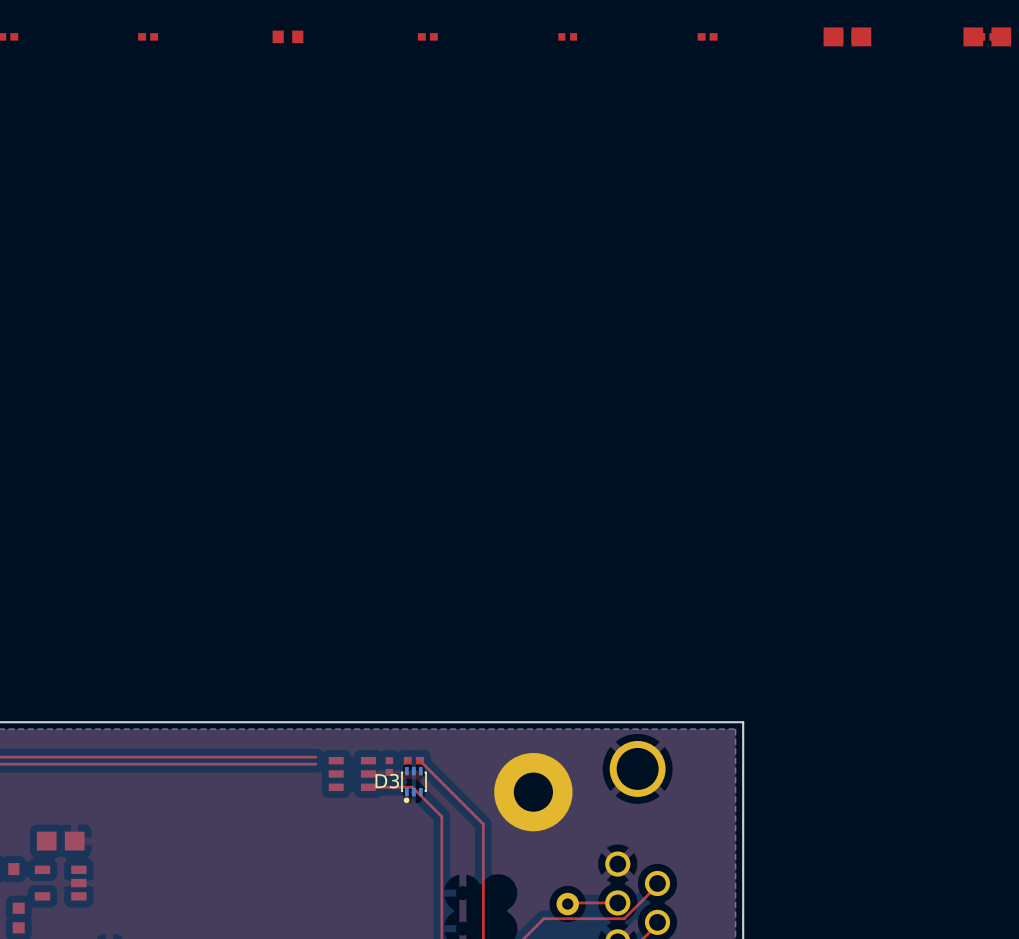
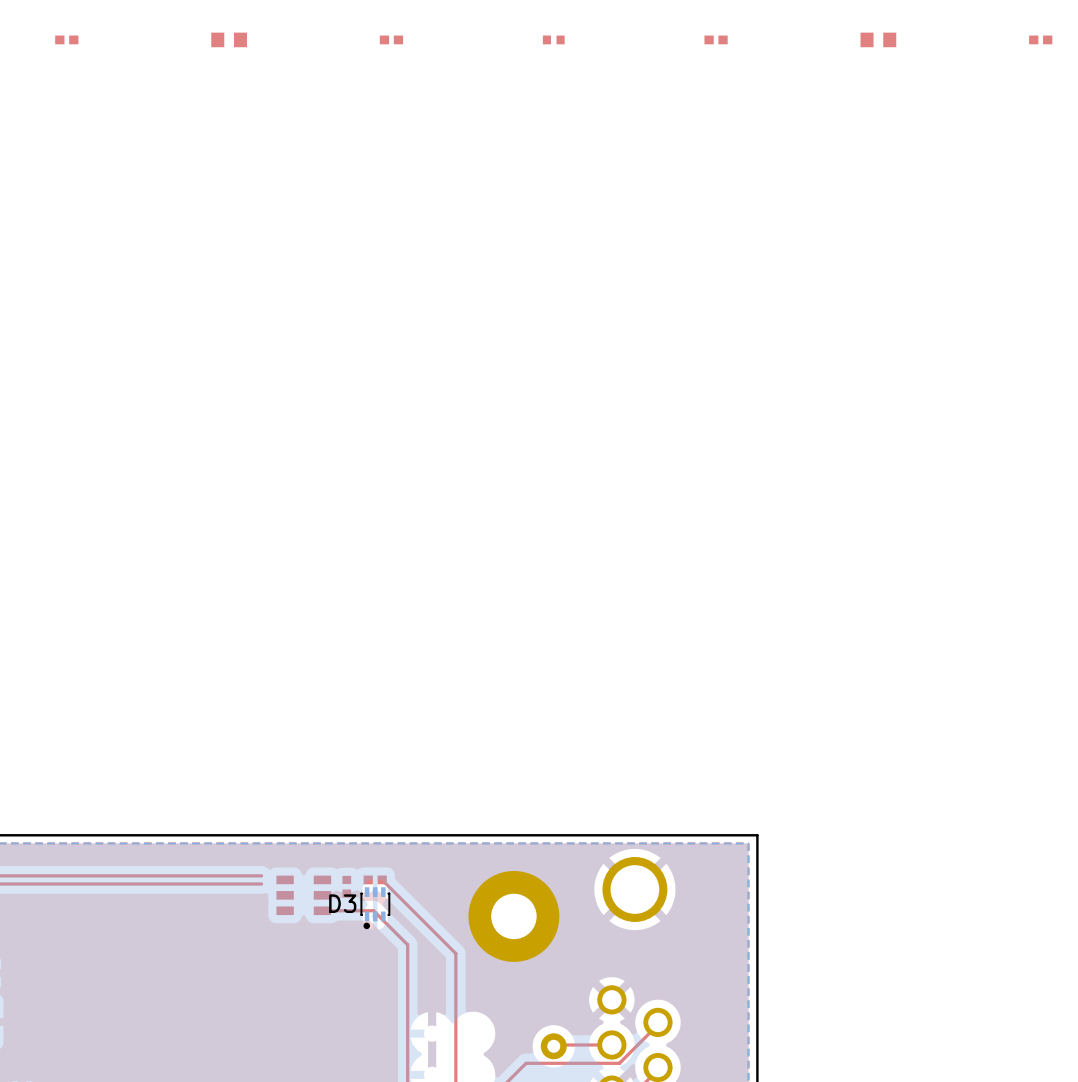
part: (847, 36) -> none
part: (987, 36) -> none

